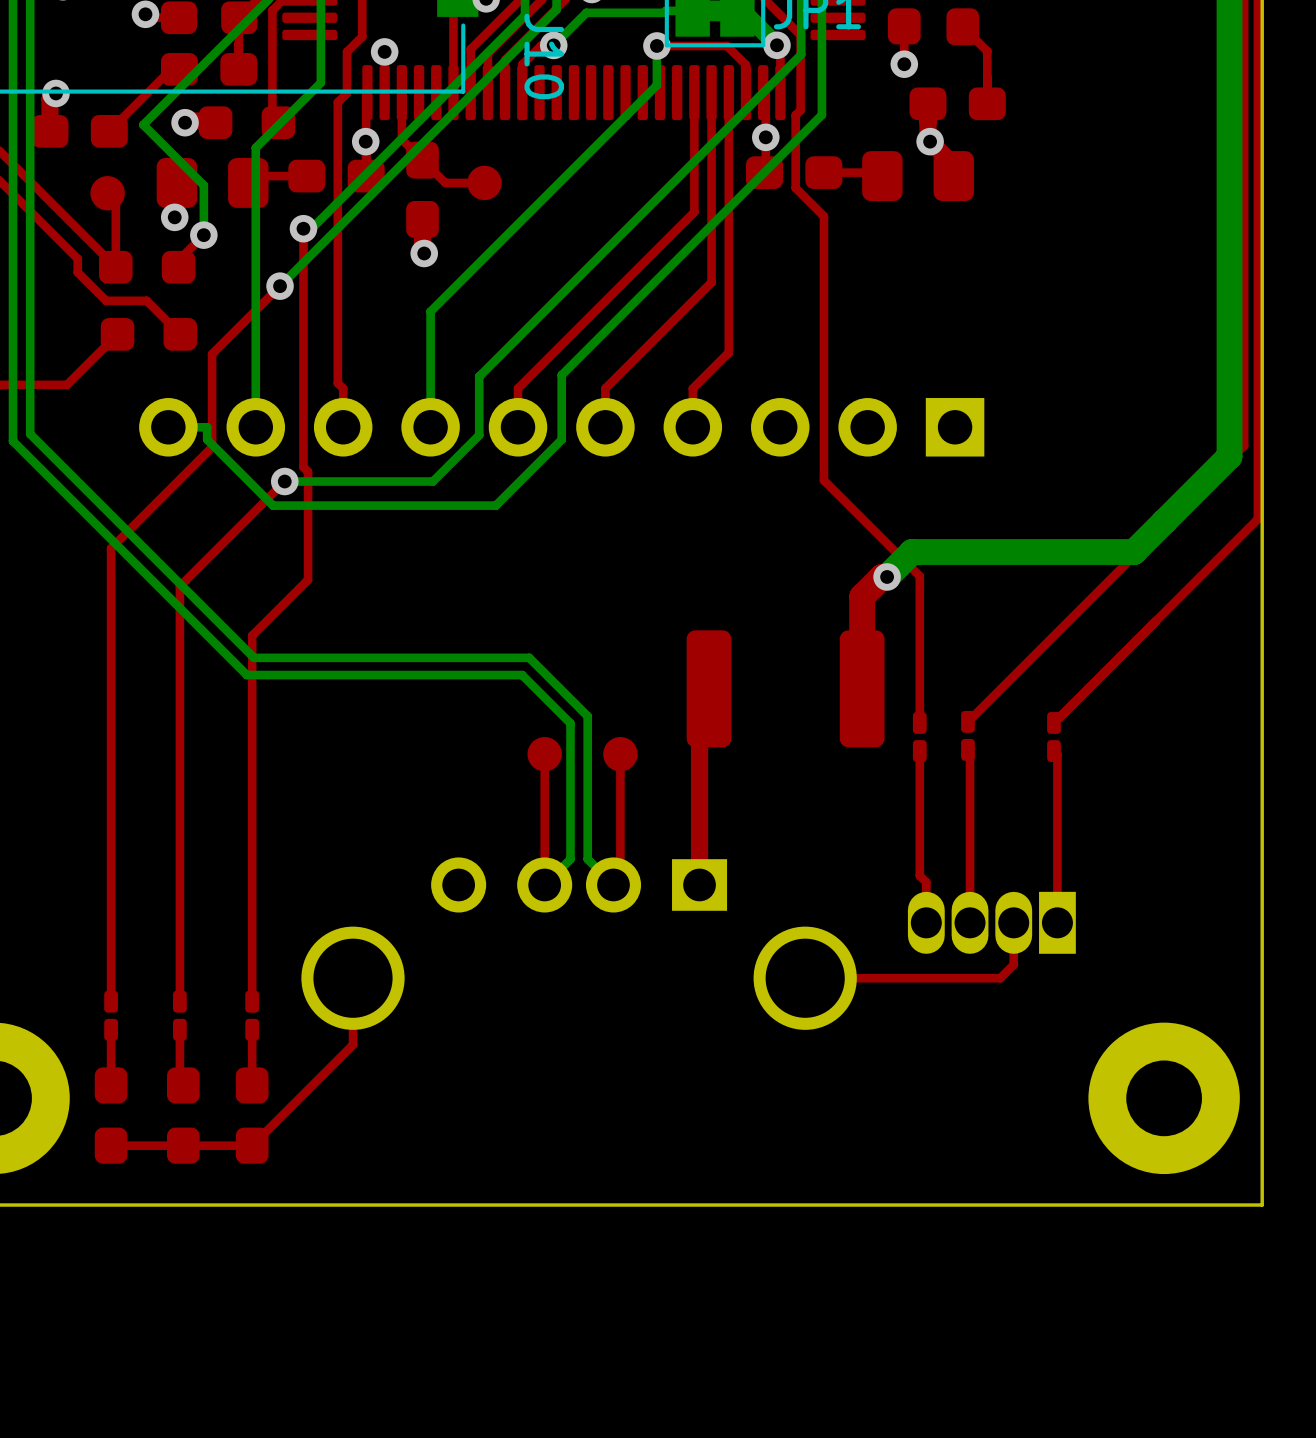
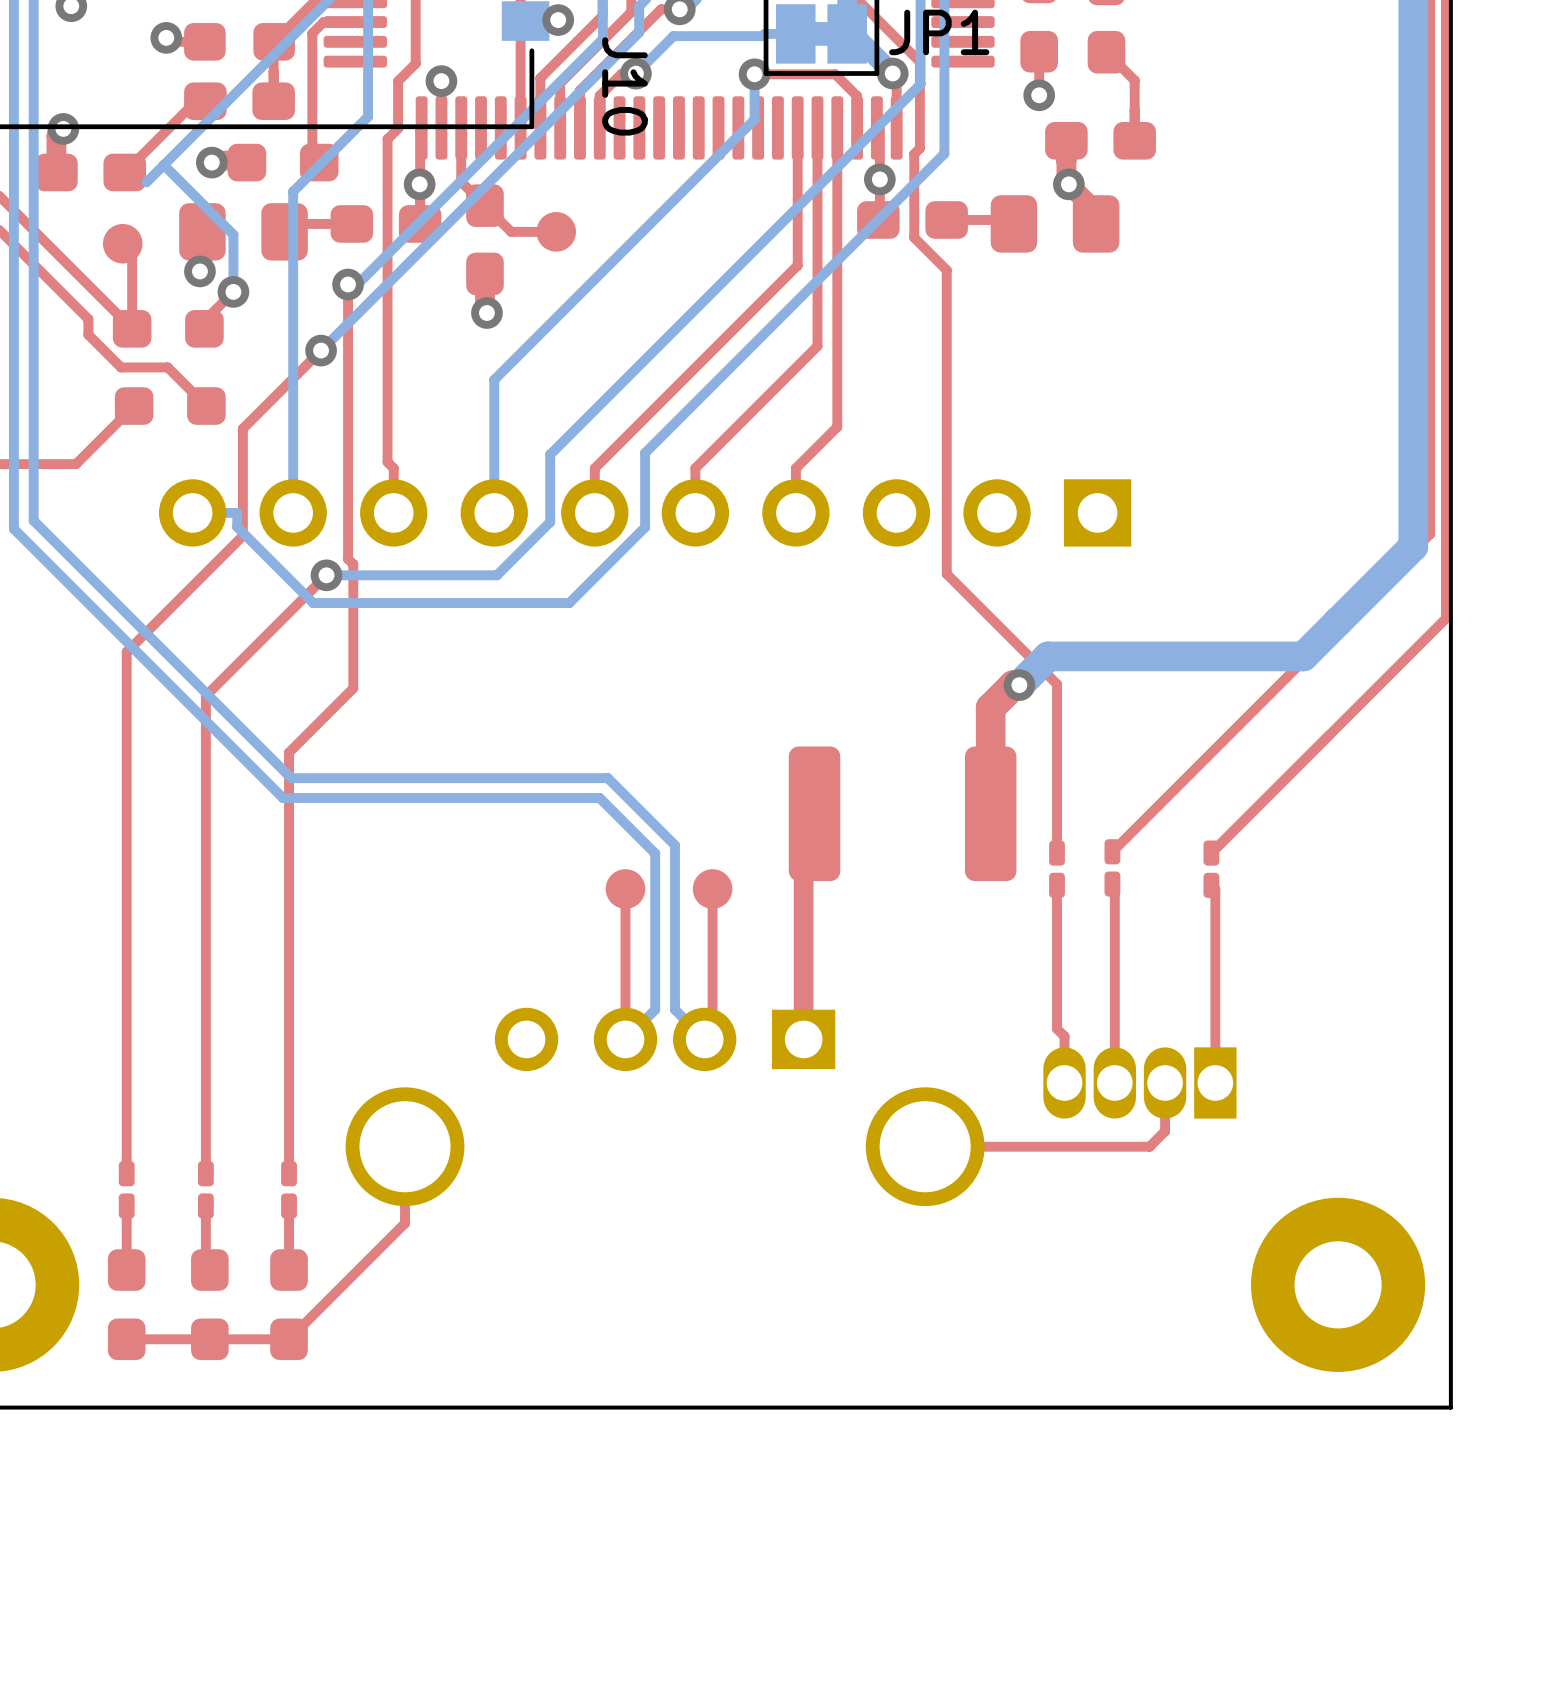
bottom track: none -> (163, 165) (146, 182)

